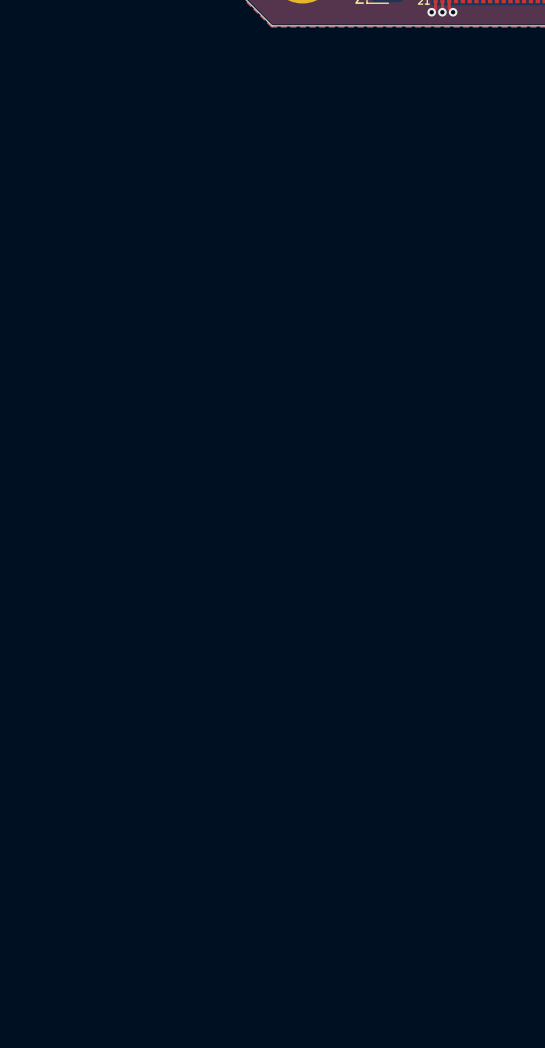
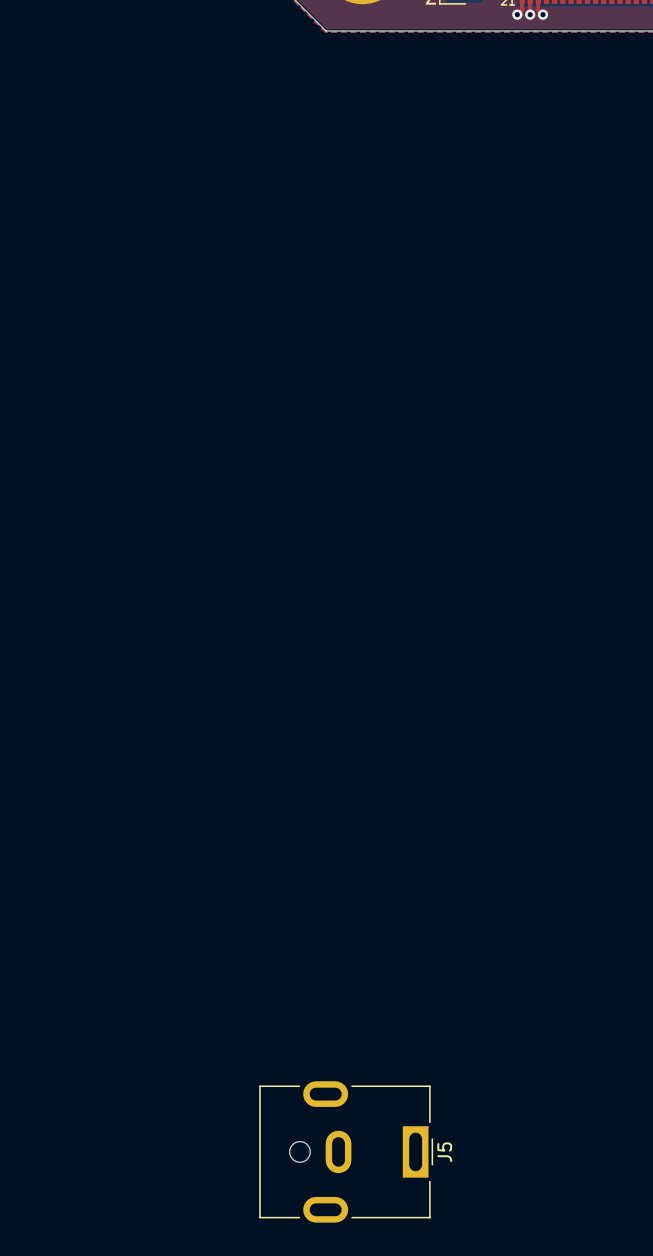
J5: none -> (346, 1151)

